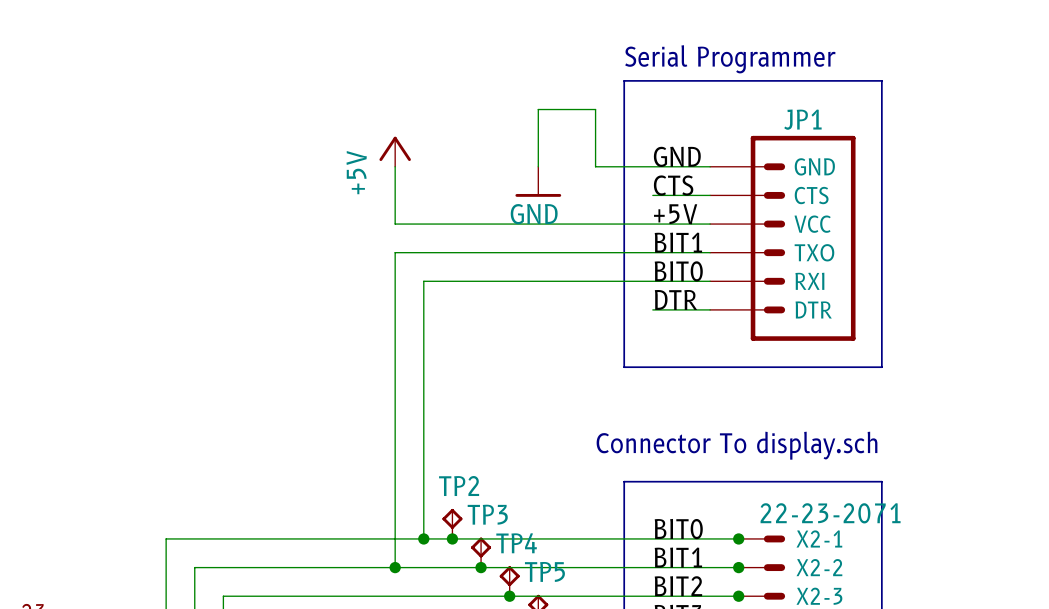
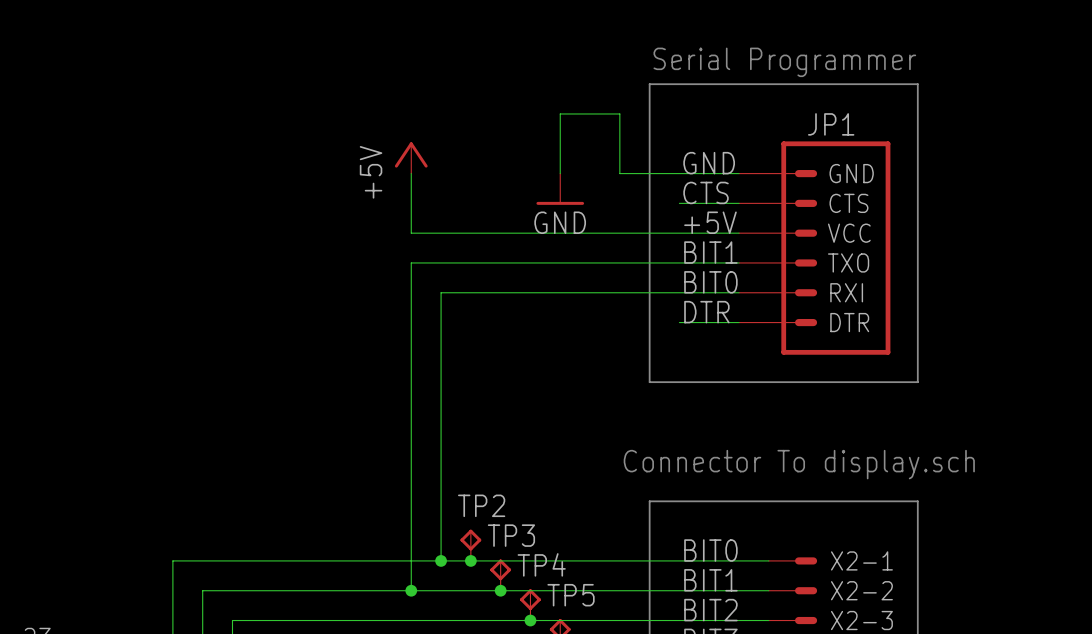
X2-1 value: 22-23-2071 (830, 513) -> none
junction: (738, 538) -> none
junction: (738, 567) -> none
junction: (738, 596) -> none

